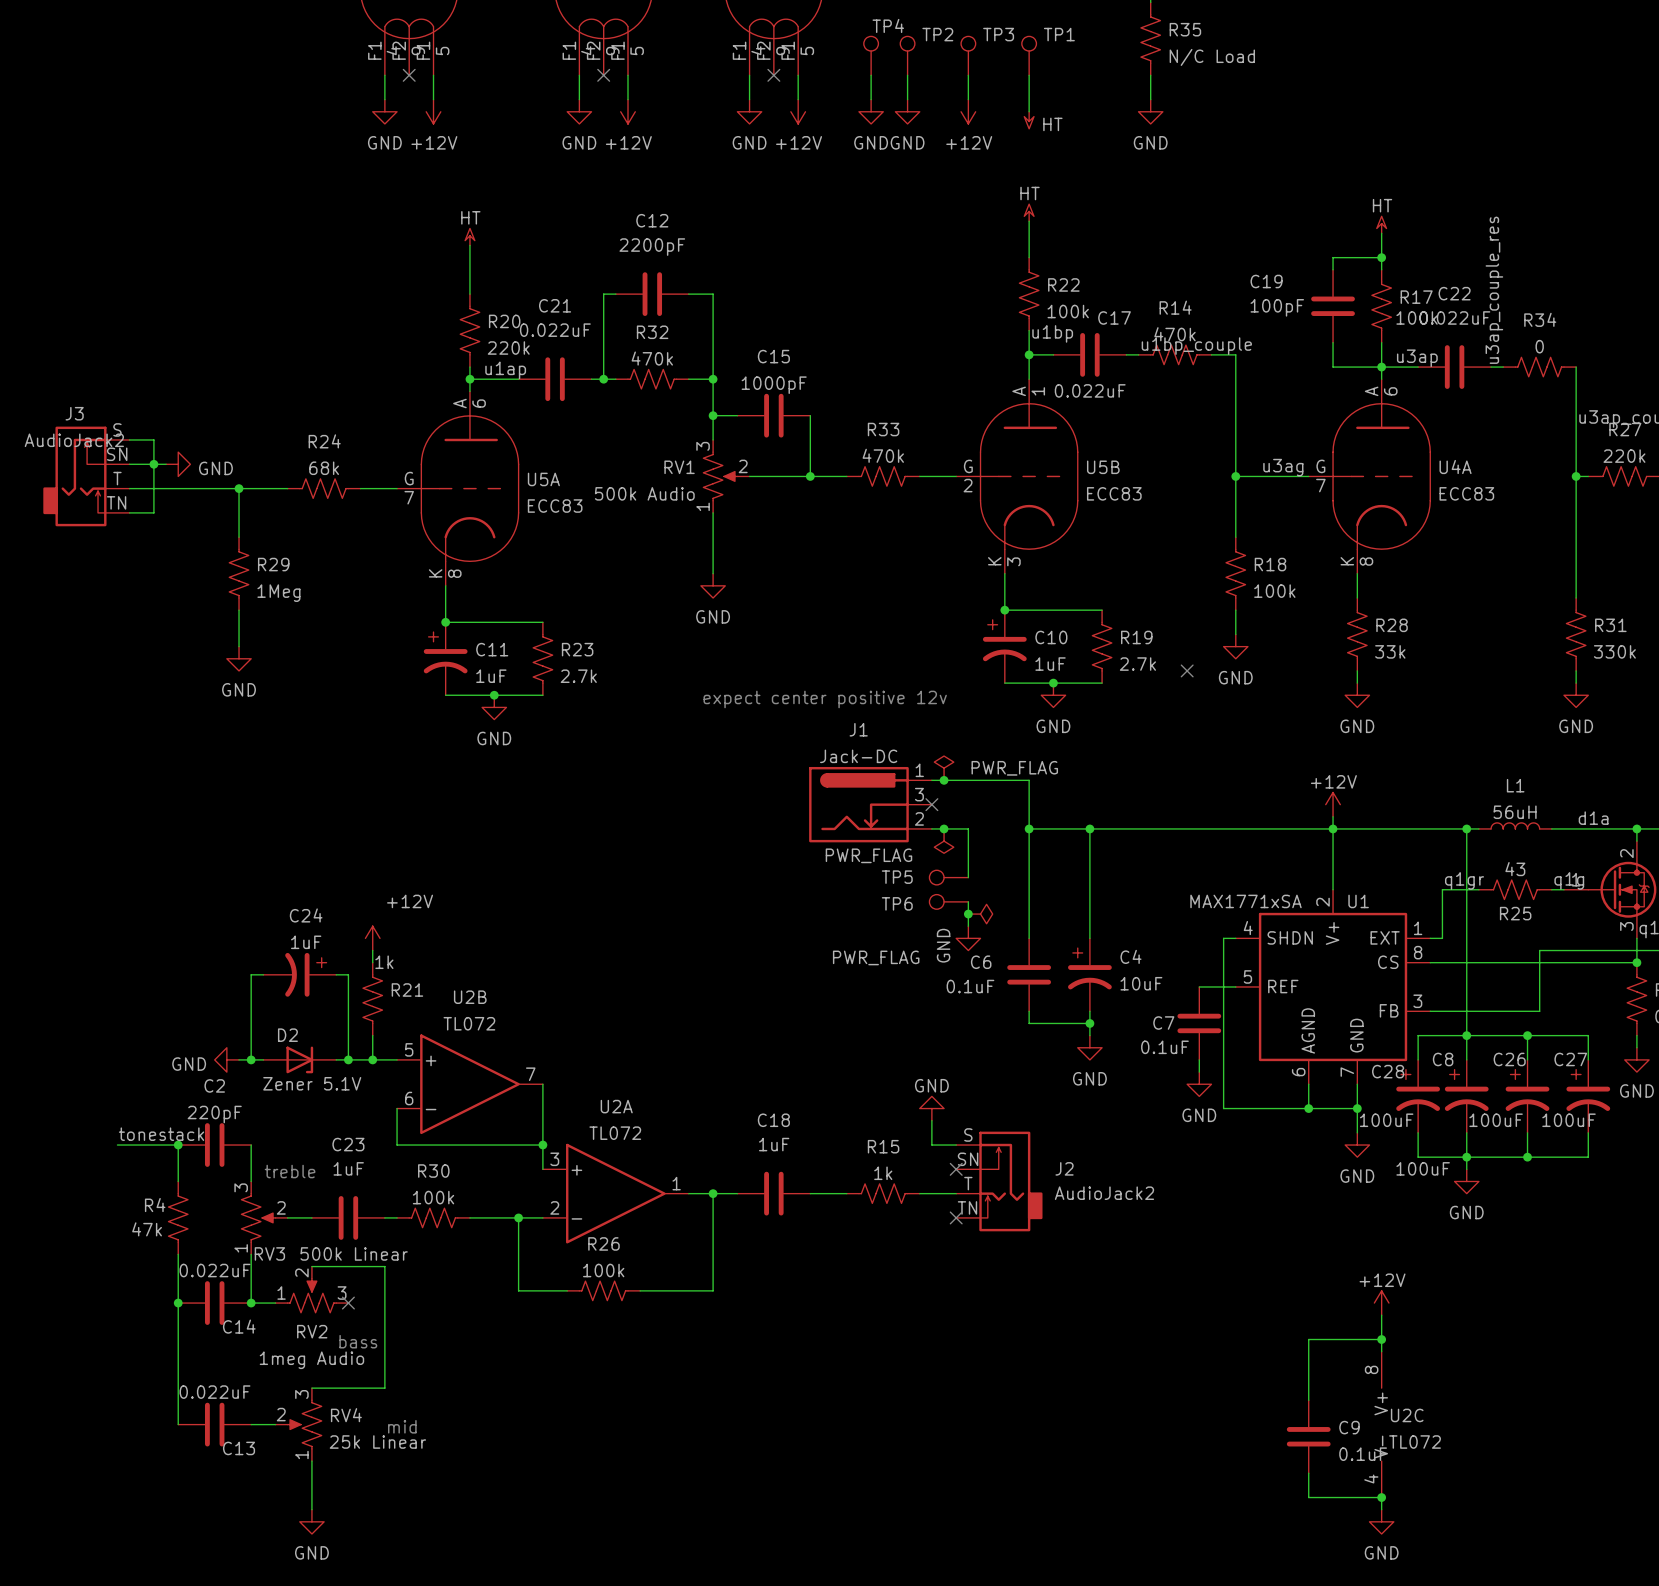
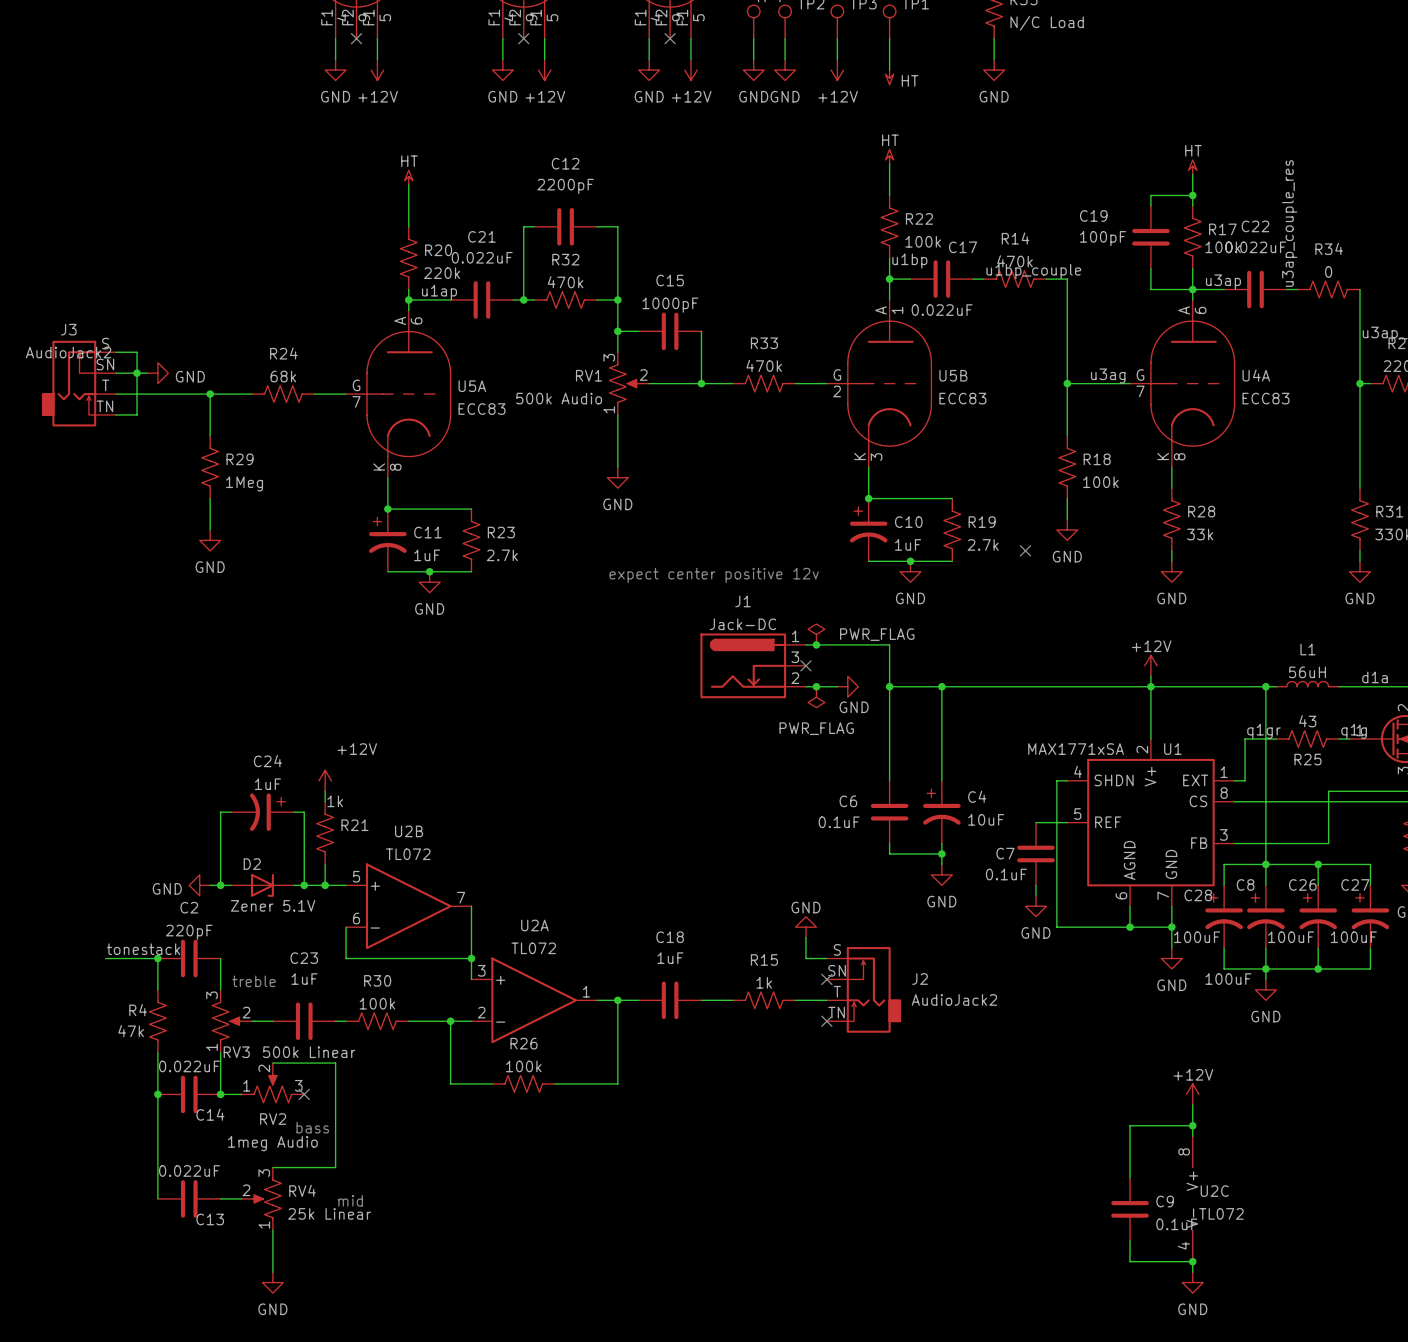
wire: (968, 828) (968, 877) -> none
power symbol text position: PWR_FLAG (868, 855) -> PWR_FLAG (816, 728)
TP5: (948, 877) -> none
TP6: (948, 901) -> none
wire: (968, 901) (968, 926) -> none
junction: (968, 914) -> none
power symbol: PWR_FLAG (980, 914) -> none
power symbol rotation: 0° (968, 938) -> 90° counterclockwise (847, 686)
power symbol position: GND (968, 938) -> GND (847, 686)

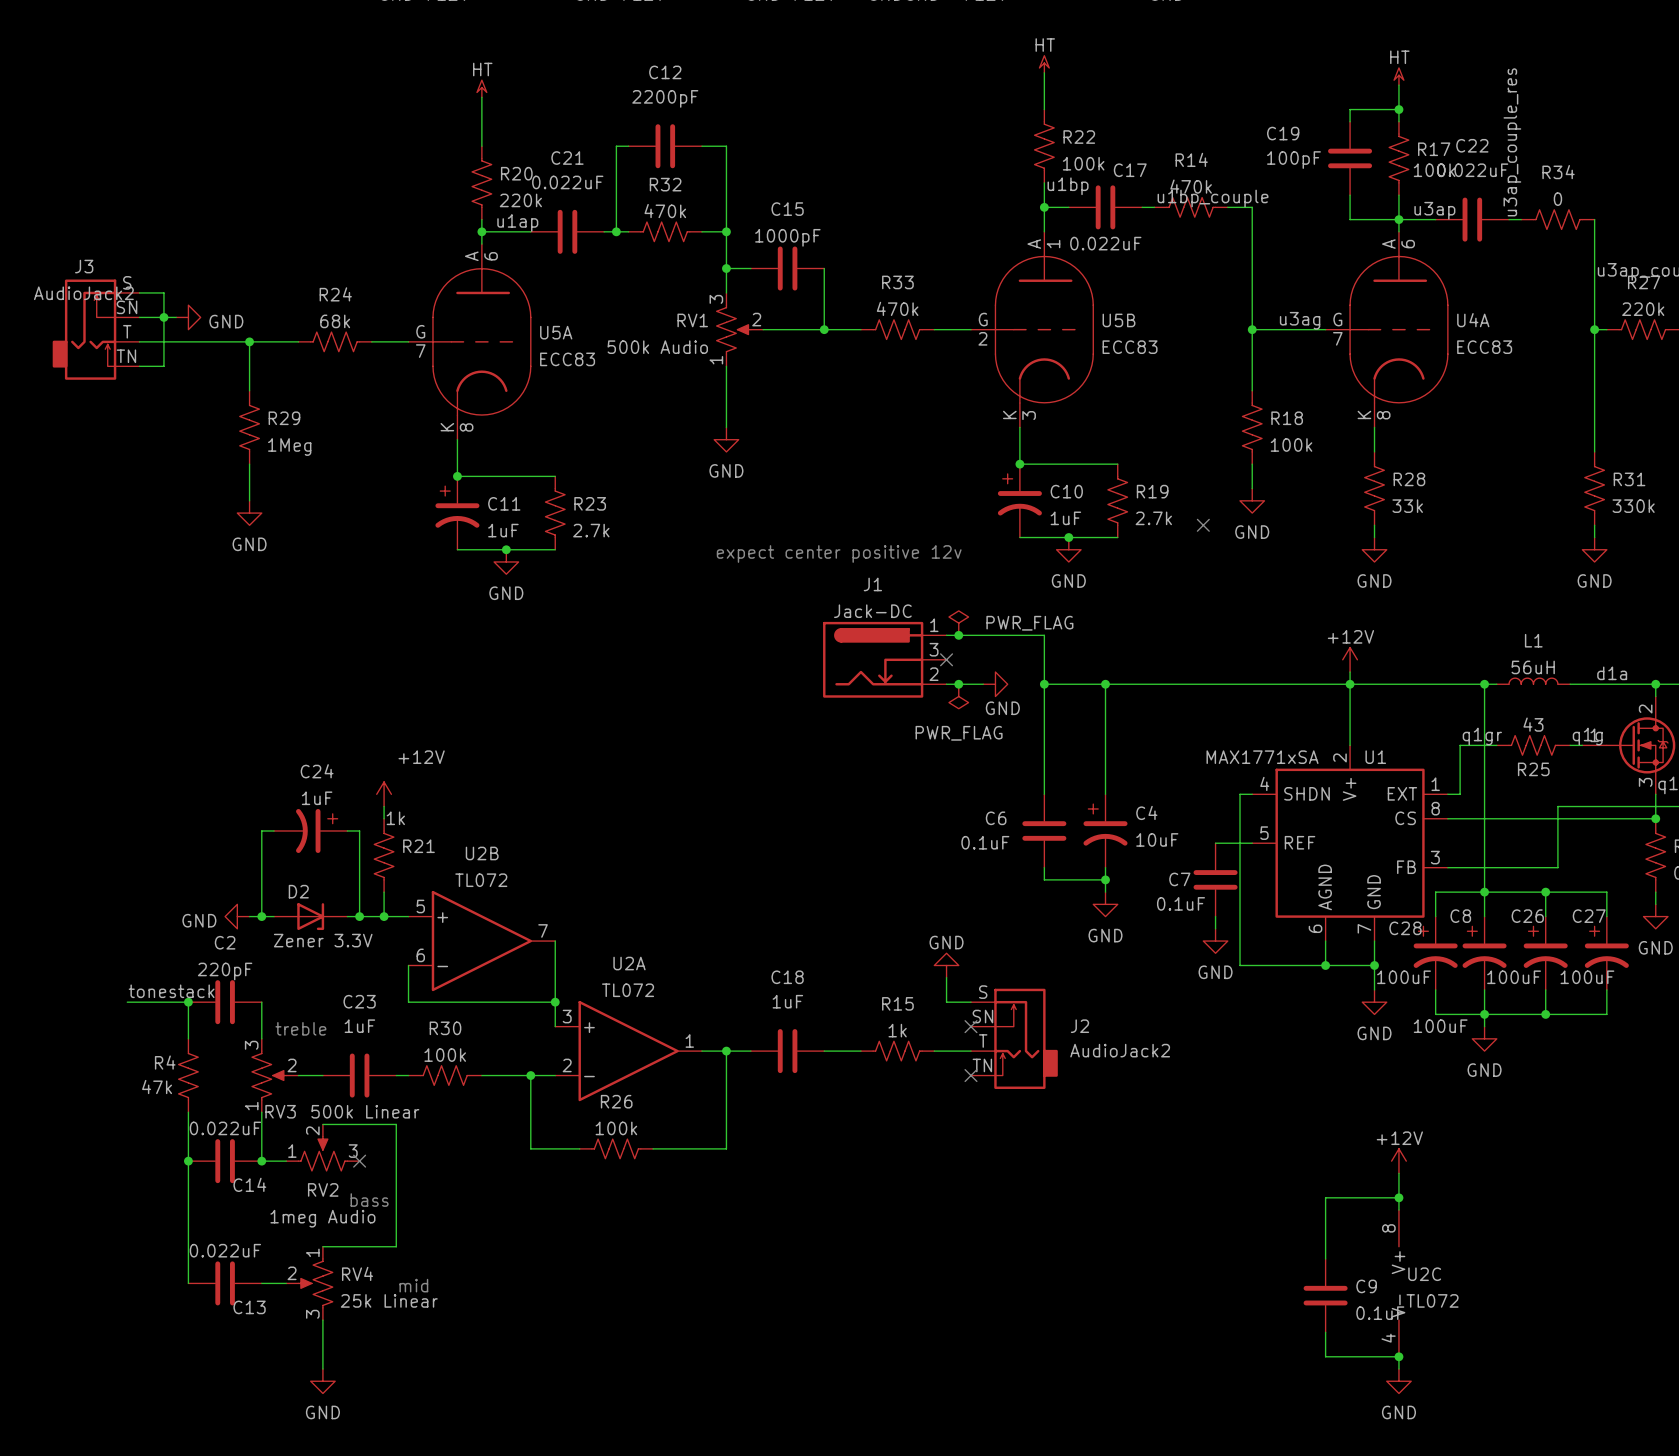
D2 value: Zener 5.1V (273, 905) -> Zener 3.3V (323, 940)
RV4 flip: as is (266, 1198) -> up-down (315, 1283)

